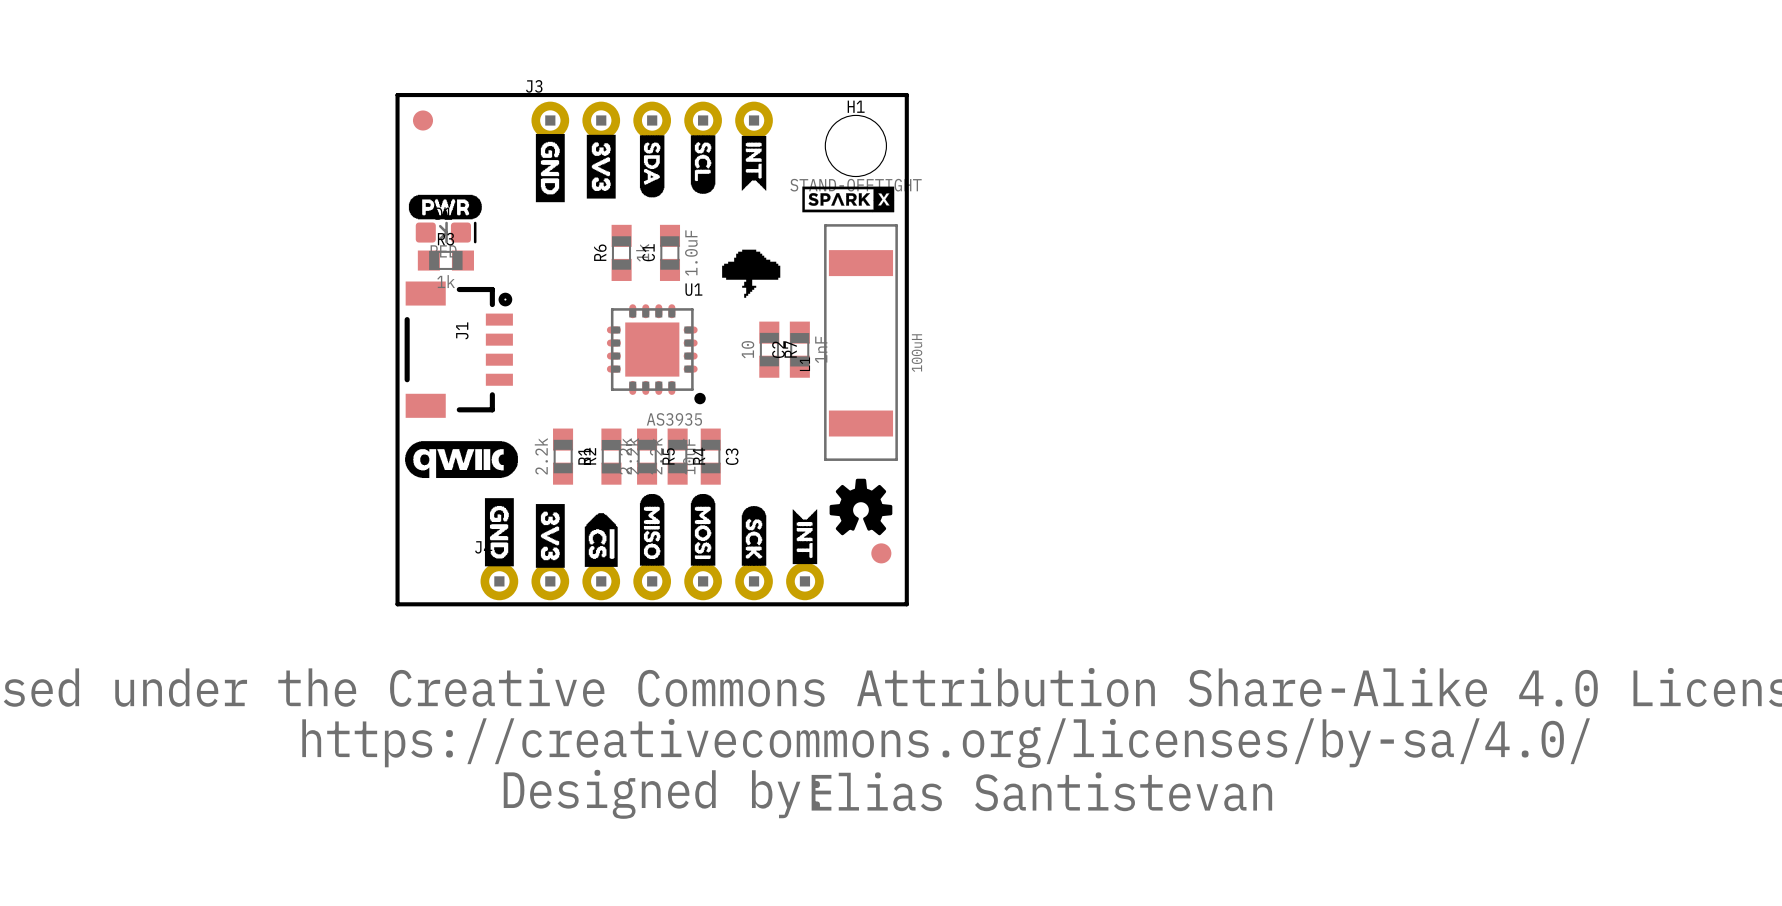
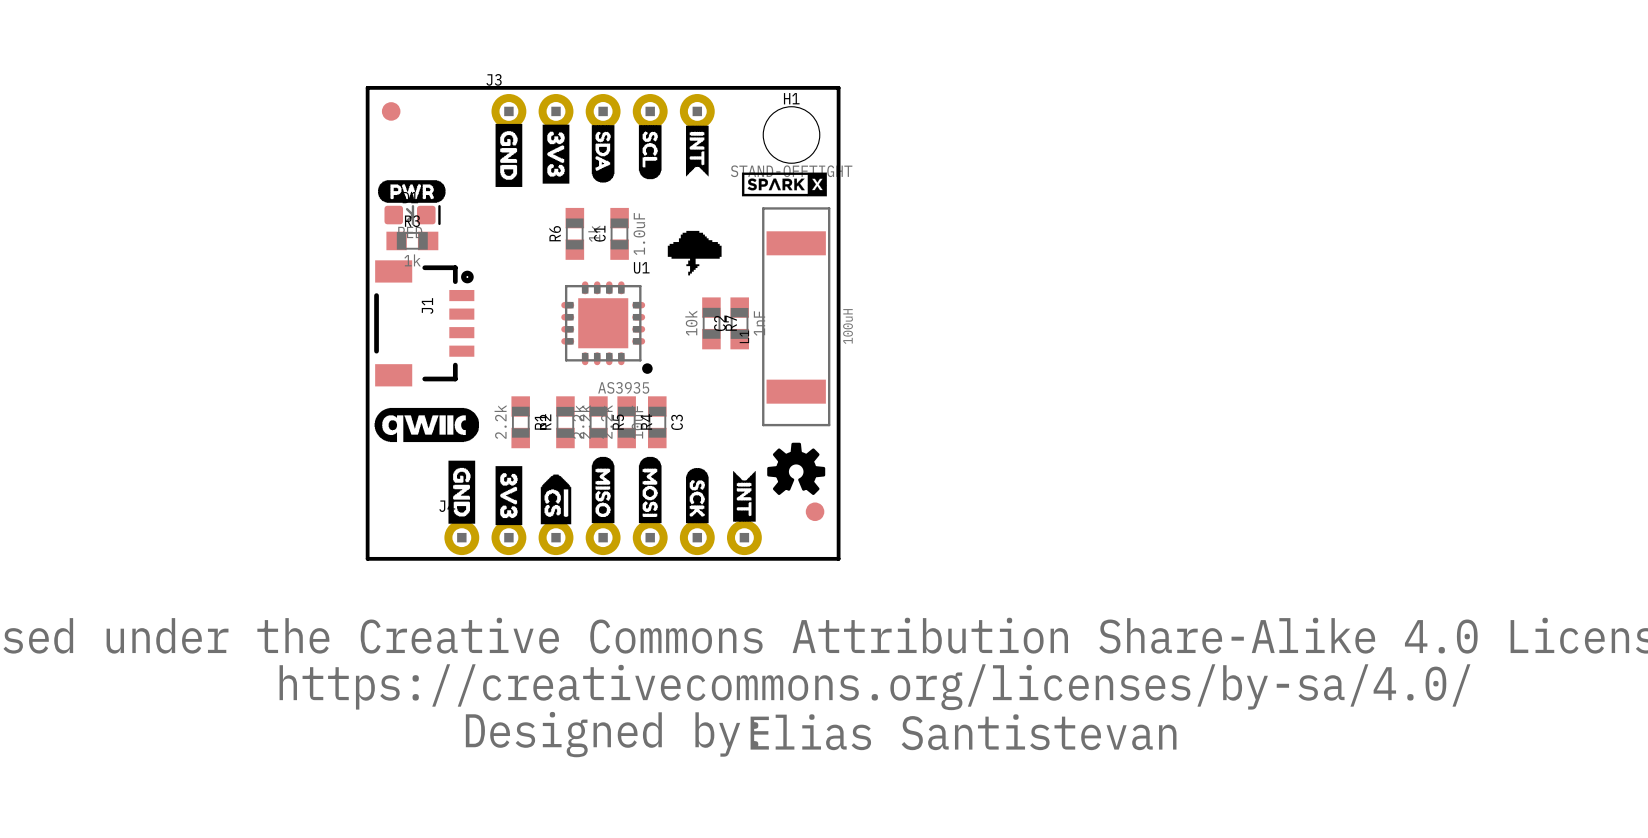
R7 value: 10 (747, 349) -> 10k (691, 323)

